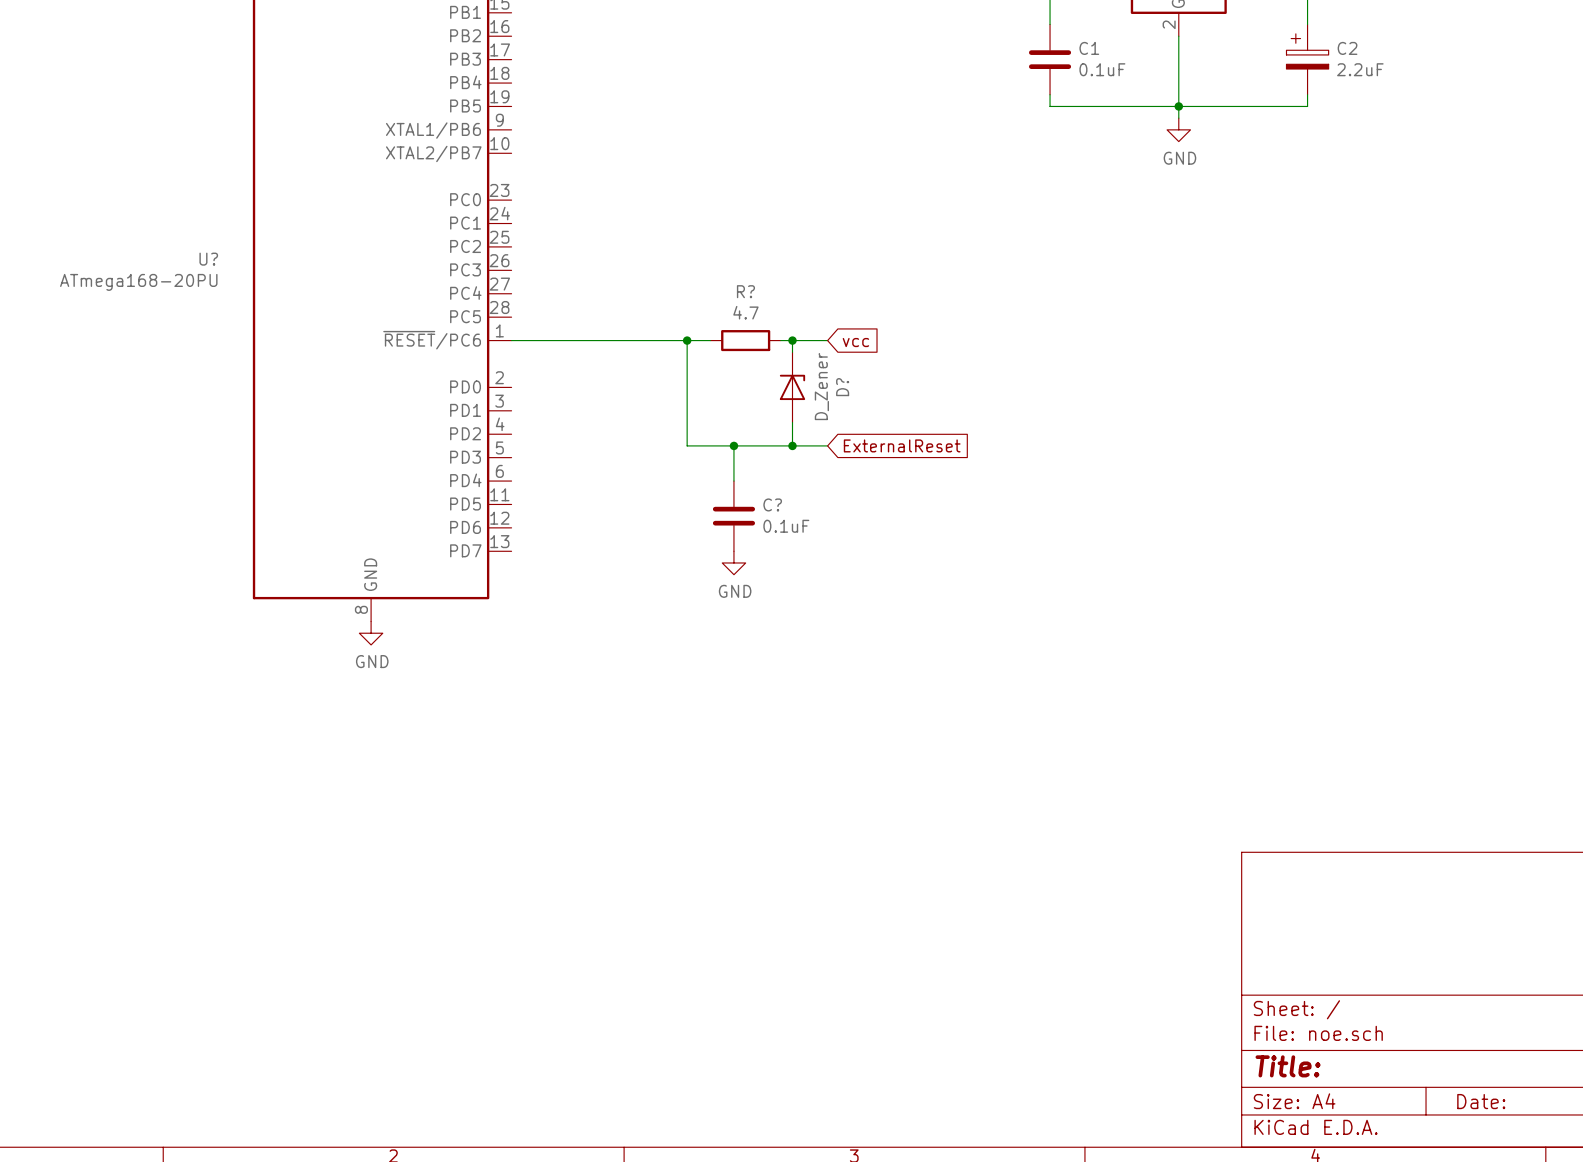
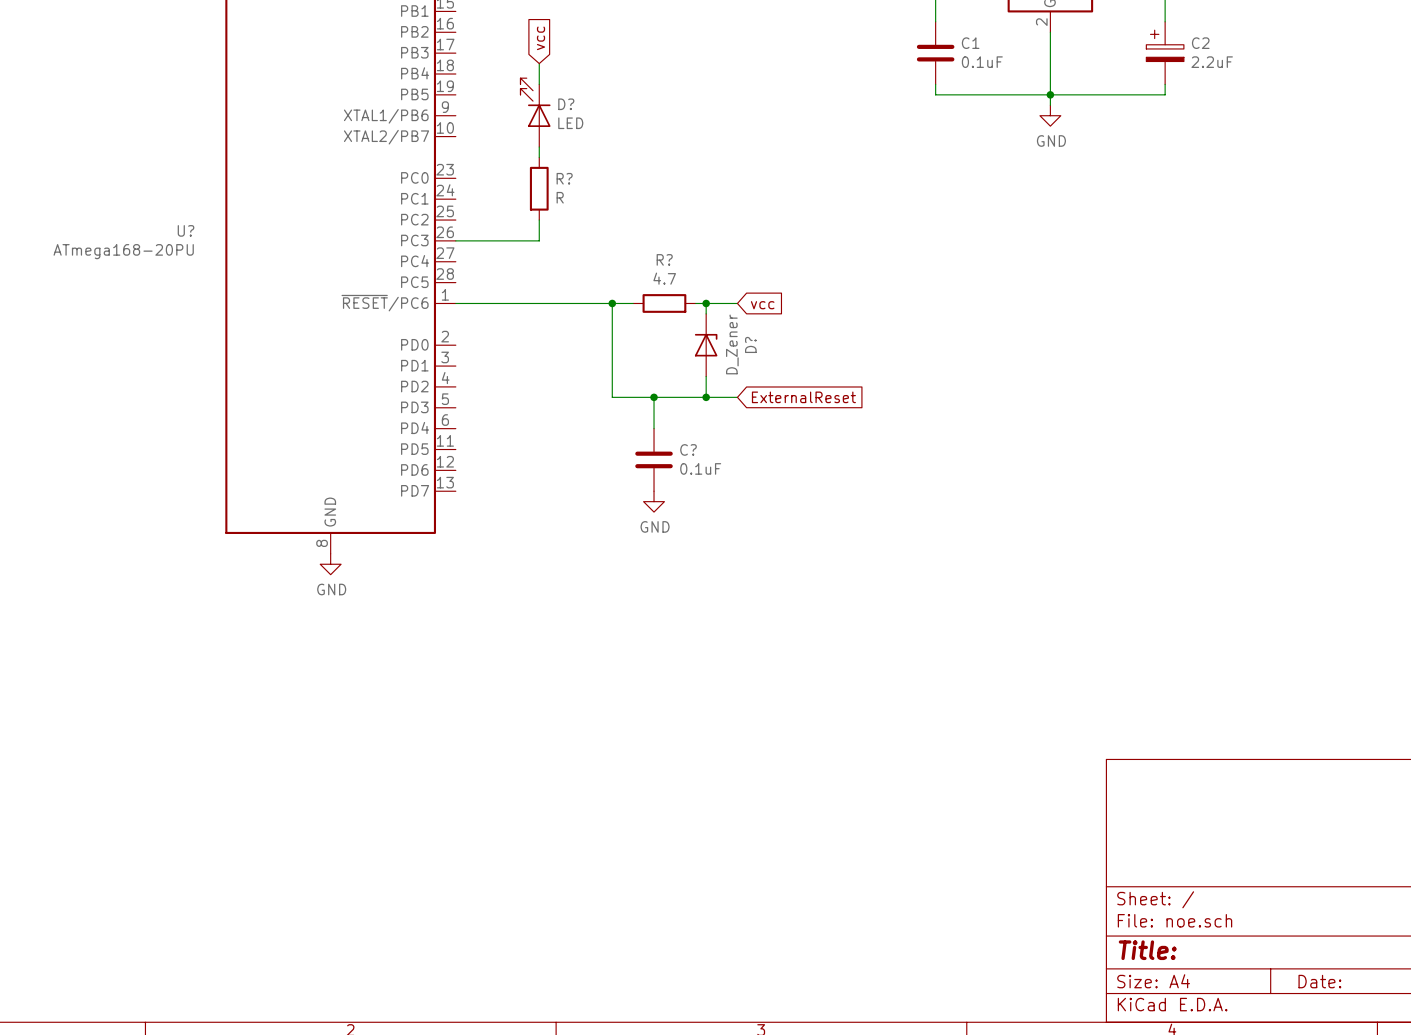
global label: none -> vcc (541, 38)
wire: none -> (539, 63) (539, 84)
D?: none -> LED (535, 112)
wire: none -> (539, 147) (539, 157)
R?: none -> R (539, 188)
wire: none -> (539, 220) (539, 240) (455, 240)

